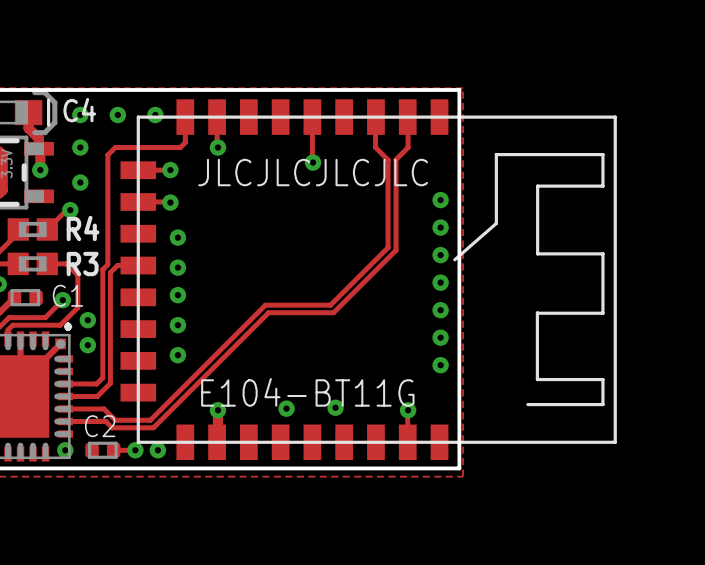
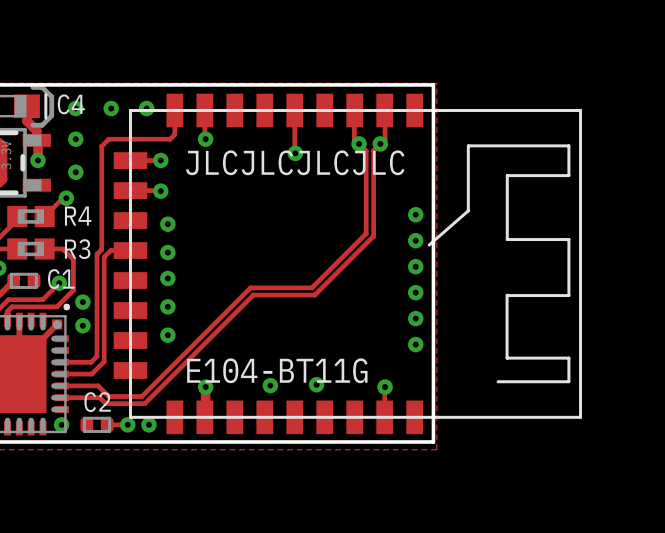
via: none -> (359, 143)
via: none -> (380, 143)
via: (440, 200) -> none

